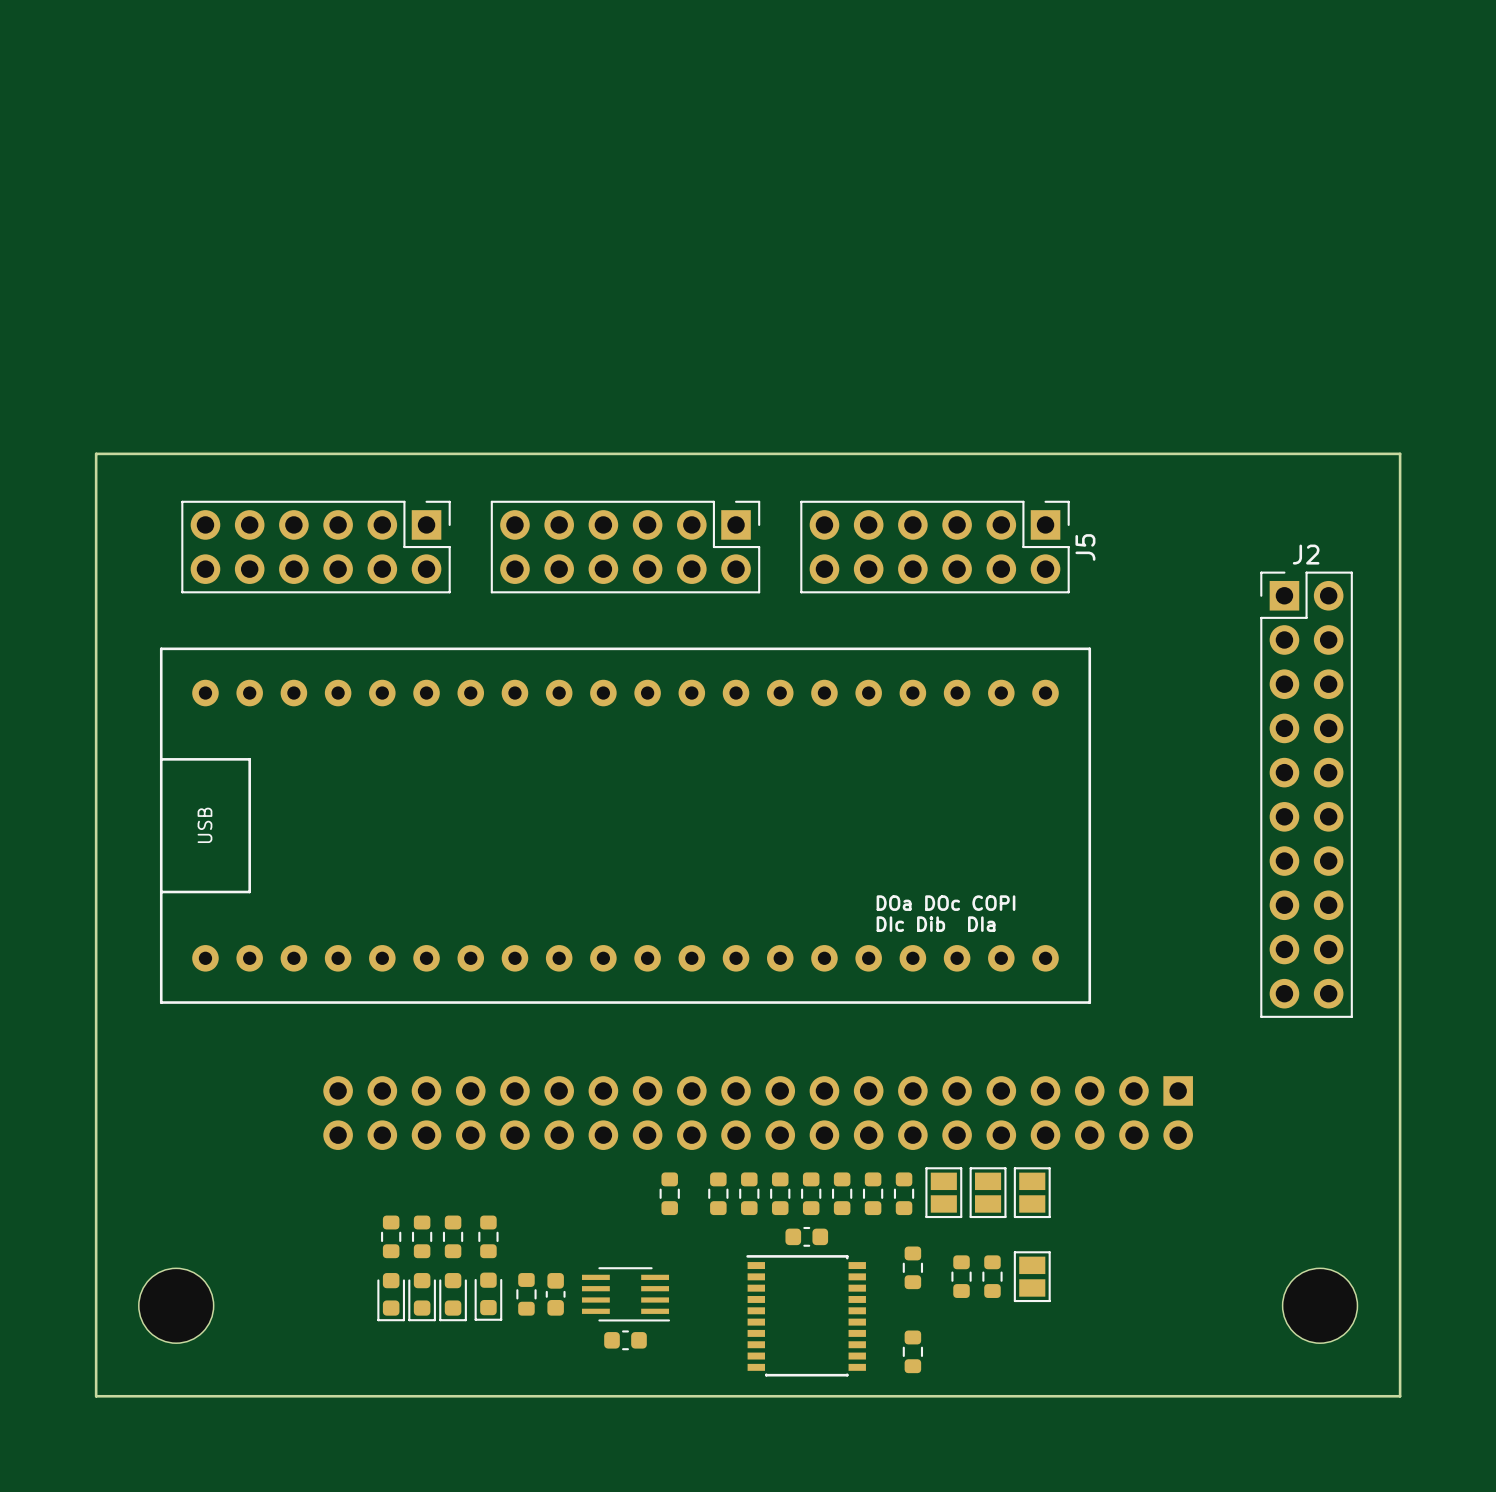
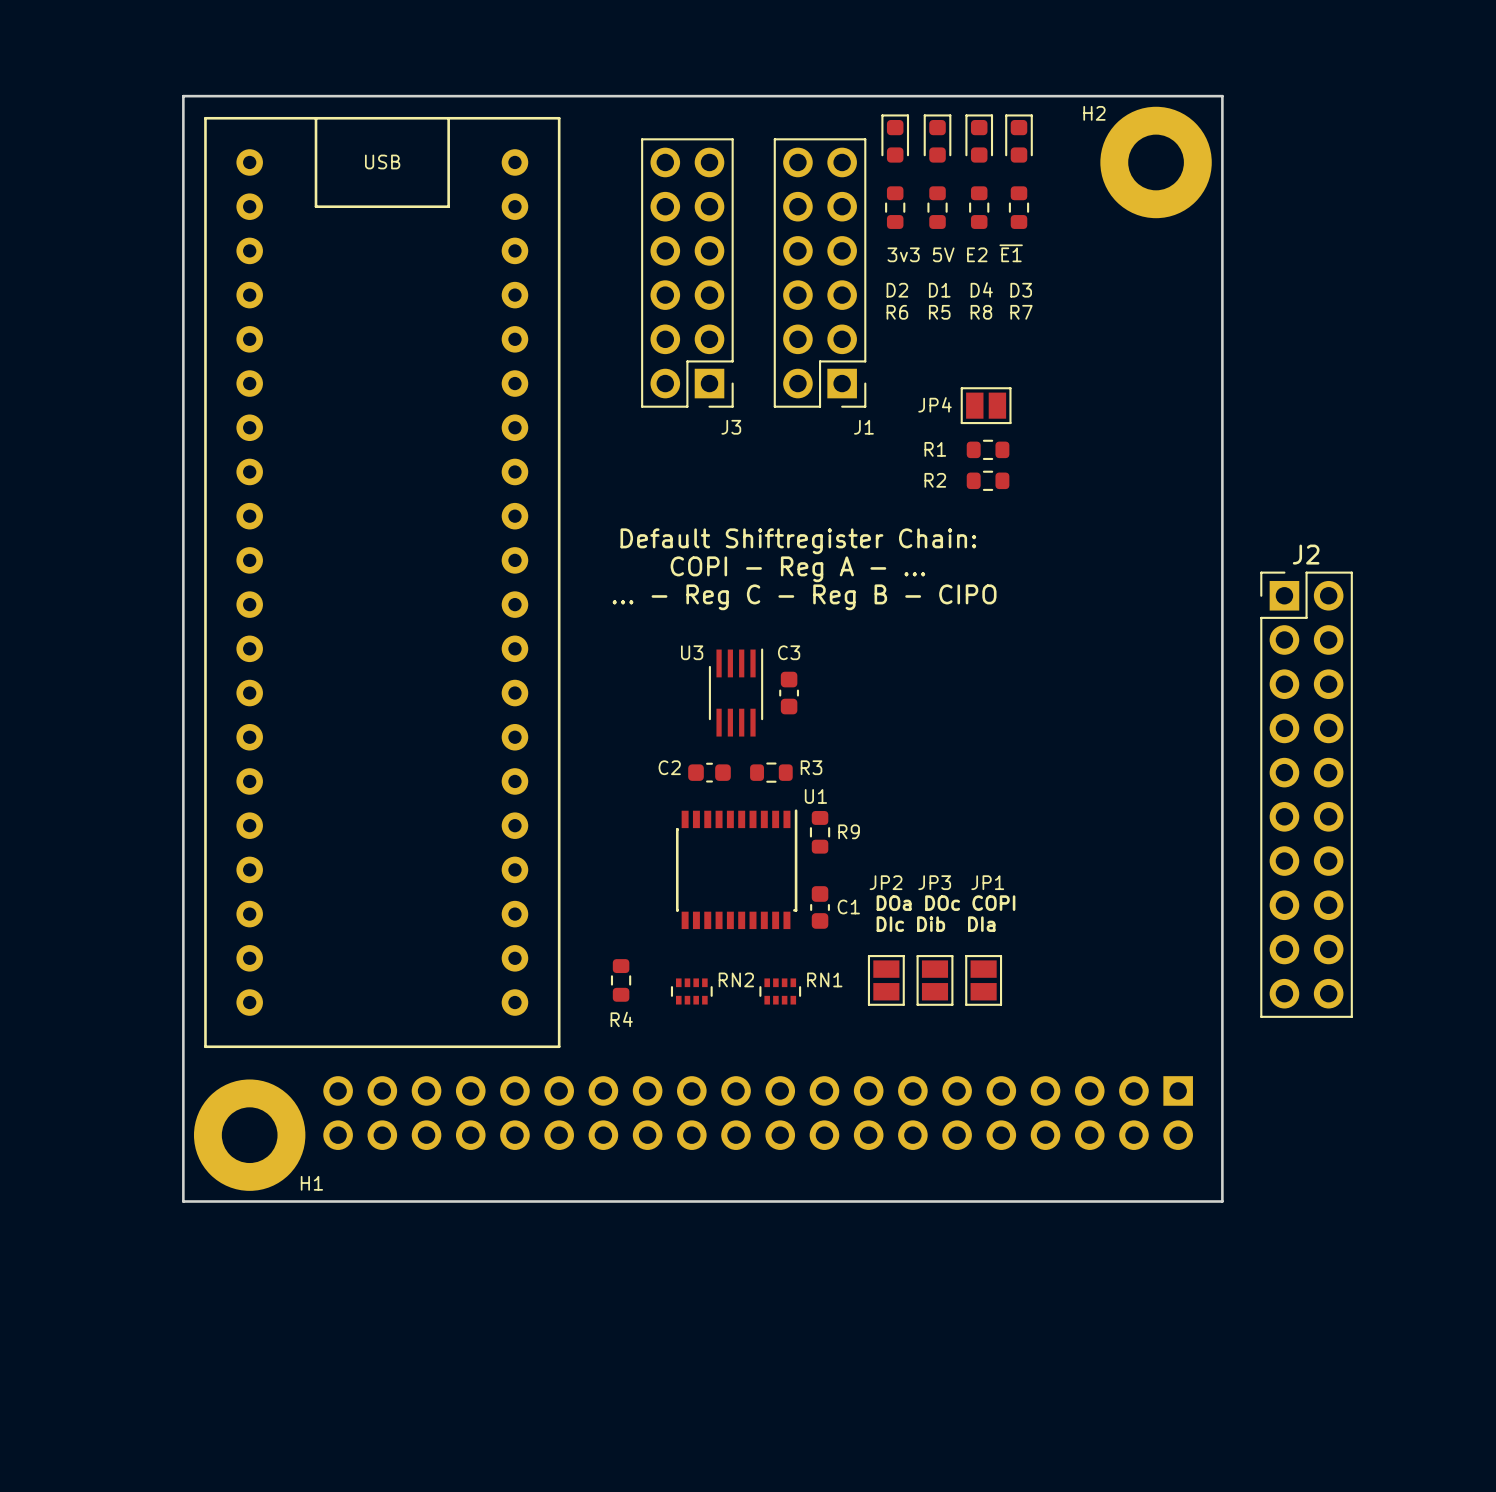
board edge: none -> (183, 96) (183, 1201) (1222, 1201) (1222, 96) (183, 96)
D2: none -> (895, 138)
D1: none -> (937, 138)
D4: none -> (979, 138)
D3: none -> (1019, 138)
H2: none -> (1156, 162)
R6: none -> (895, 207)
R5: none -> (937, 207)
R8: none -> (979, 207)
R7: none -> (1019, 207)
text: none -> 3v3 5V E2 ~{E1} (955, 253)
J3: none -> (687, 273)
J1: none -> (820, 273)
JP4: none -> (986, 405)
R1: none -> (988, 449)
board edge: (96, 453) (96, 1396) (1400, 1396) (1400, 453) (96, 453) -> none
R2: none -> (988, 480)
text: none -> Default Shiftregister Chain: (798, 541)
part: (316, 547) -> none
part: (625, 547) -> none
J5: (934, 547) -> none
text: none -> COPI - Reg A - ... (797, 569)
text: none -> ... - Reg C - Reg B - CIPO (804, 597)
U3: none -> (736, 692)
C3: none -> (789, 693)
C2: none -> (709, 772)
R3: none -> (771, 772)
part rotation: 0° (625, 825) -> 90° clockwise (382, 582)
R9: none -> (820, 832)
U1: none -> (736, 869)
C1: none -> (820, 907)
R4: none -> (621, 980)
JP2: none -> (886, 980)
JP3: none -> (934, 980)
JP1: none -> (983, 980)
RN2: none -> (691, 991)
RN1: none -> (780, 991)
H1: none -> (249, 1135)
part: (943, 1192) -> none
part: (988, 1192) -> none
part: (1032, 1192) -> none
part: (669, 1193) -> none
part: (718, 1193) -> none
part: (749, 1193) -> none
part: (780, 1193) -> none
part: (811, 1193) -> none
part: (842, 1193) -> none
part: (873, 1193) -> none
part: (904, 1193) -> none
part: (391, 1236) -> none
part: (422, 1236) -> none
part: (453, 1236) -> none
part: (488, 1236) -> none
part: (806, 1236) -> none
part: (912, 1267) -> none
part: (961, 1276) -> none
part: (992, 1276) -> none
part: (1032, 1276) -> none
part: (526, 1294) -> none
part: (555, 1294) -> none
part: (626, 1294) -> none
part: (488, 1296) -> none
part: (391, 1297) -> none
part: (422, 1297) -> none
part: (453, 1297) -> none
part: (176, 1305) -> none
part: (1320, 1305) -> none
part: (806, 1315) -> none
part: (625, 1340) -> none
part: (912, 1351) -> none

